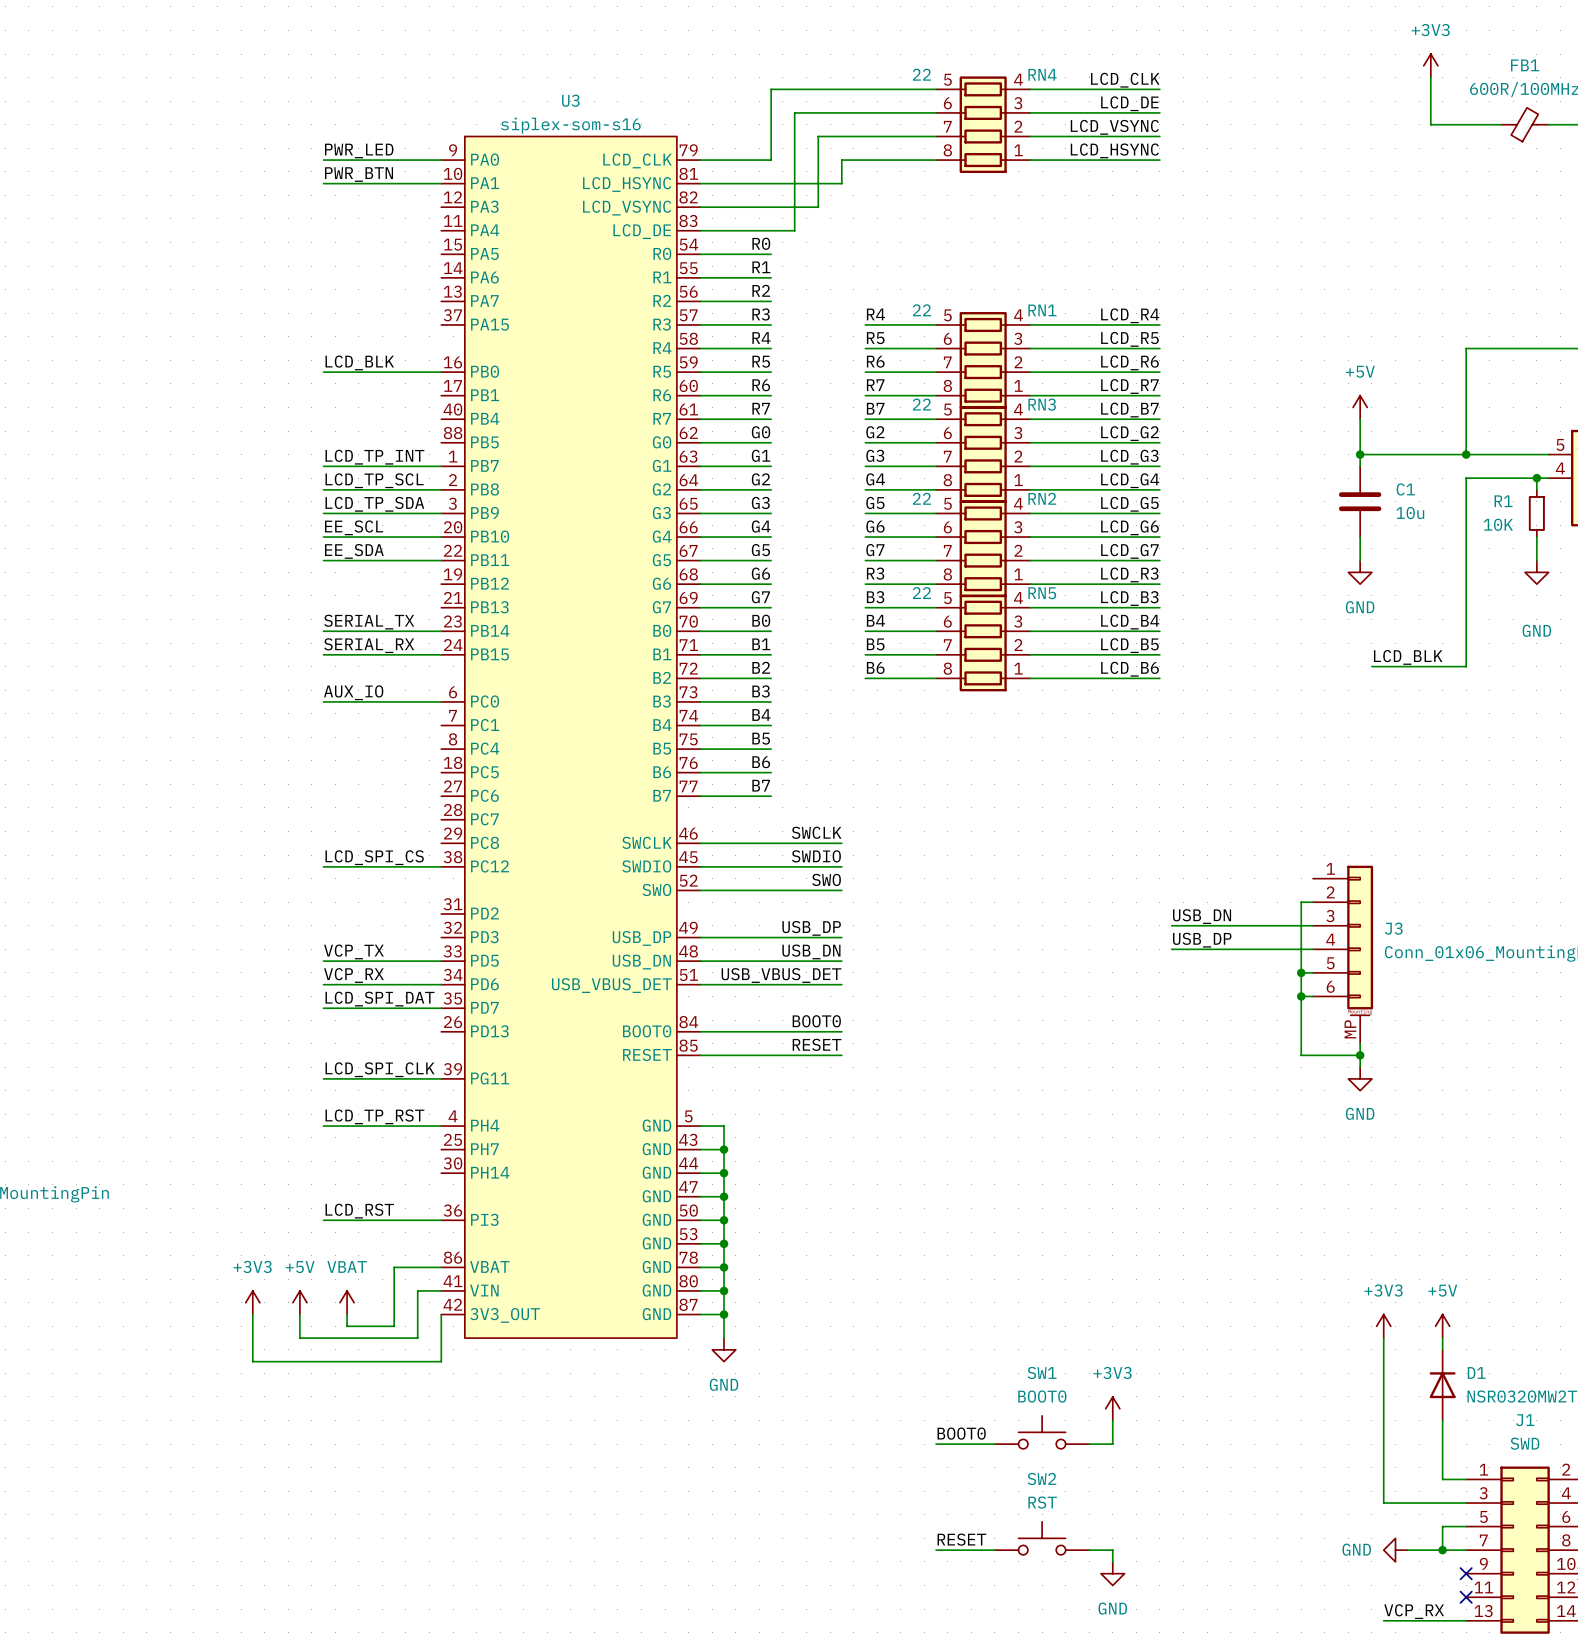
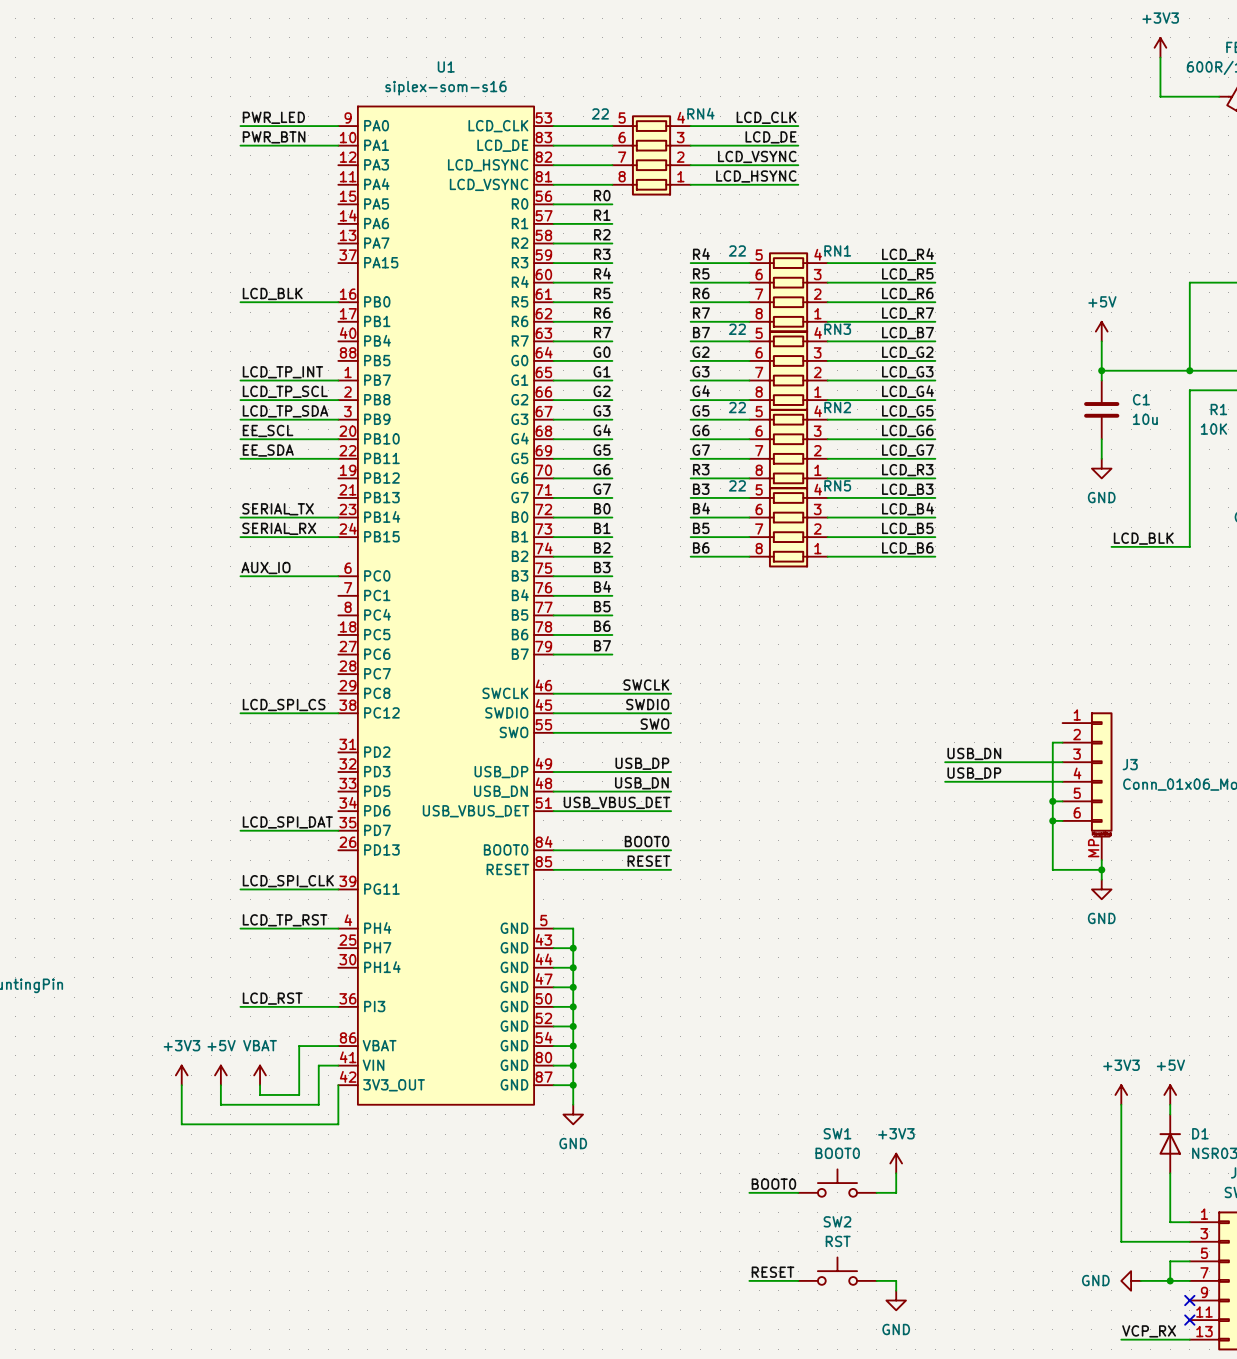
label position: LCD_CLK (1125, 80) -> LCD_CLK (766, 117)
wire: (936, 89) (771, 89) (771, 160) -> none
wire: (1030, 89) (1159, 89) -> none
U3 name: U3 (570, 100) -> U1 (446, 66)
label position: LCD_DE (1129, 103) -> LCD_DE (770, 137)
wire: (936, 112) (794, 112) (794, 230) (771, 230) -> none
wire: (1030, 112) (1159, 112) -> (690, 145) (798, 145)
RN4 position: (983, 124) -> (651, 155)
label position: LCD_VSYNC (1114, 127) -> LCD_VSYNC (757, 156)
U3 symbol: [441, 136, 701, 1339] -> [338, 106, 554, 1105]
wire: (936, 136) (818, 136) (818, 207) (771, 207) -> none
wire: (1030, 136) (1159, 136) -> (690, 165) (798, 165)
label position: LCD_HSYNC (1114, 150) -> LCD_HSYNC (756, 176)
wire: (1030, 160) (1159, 160) -> (690, 184) (798, 184)
label: VCP_TX (353, 951) -> none
wire: (323, 961) (441, 961) -> none
label: VCP_RX (353, 975) -> none
wire: (323, 984) (441, 984) -> none

